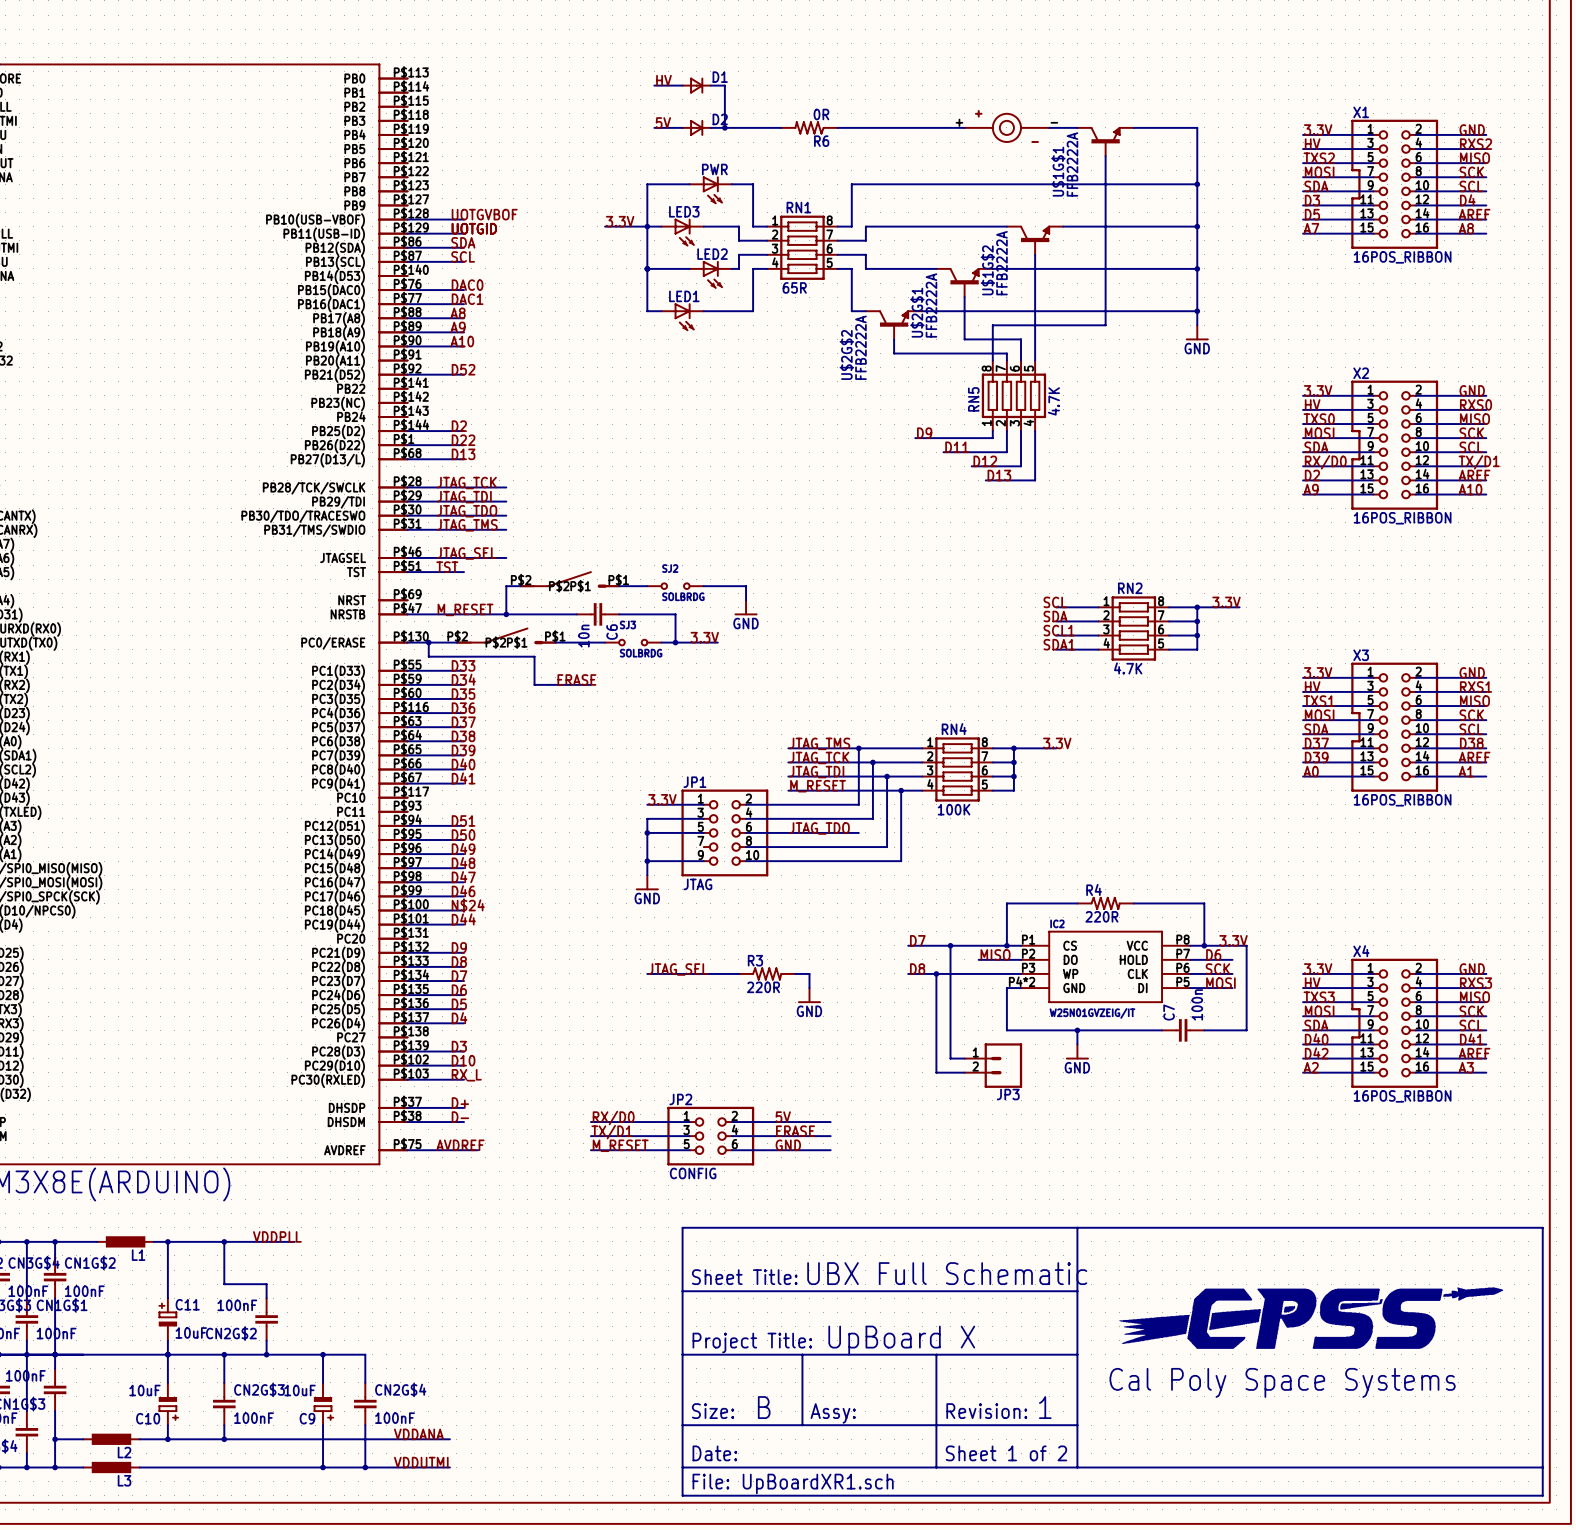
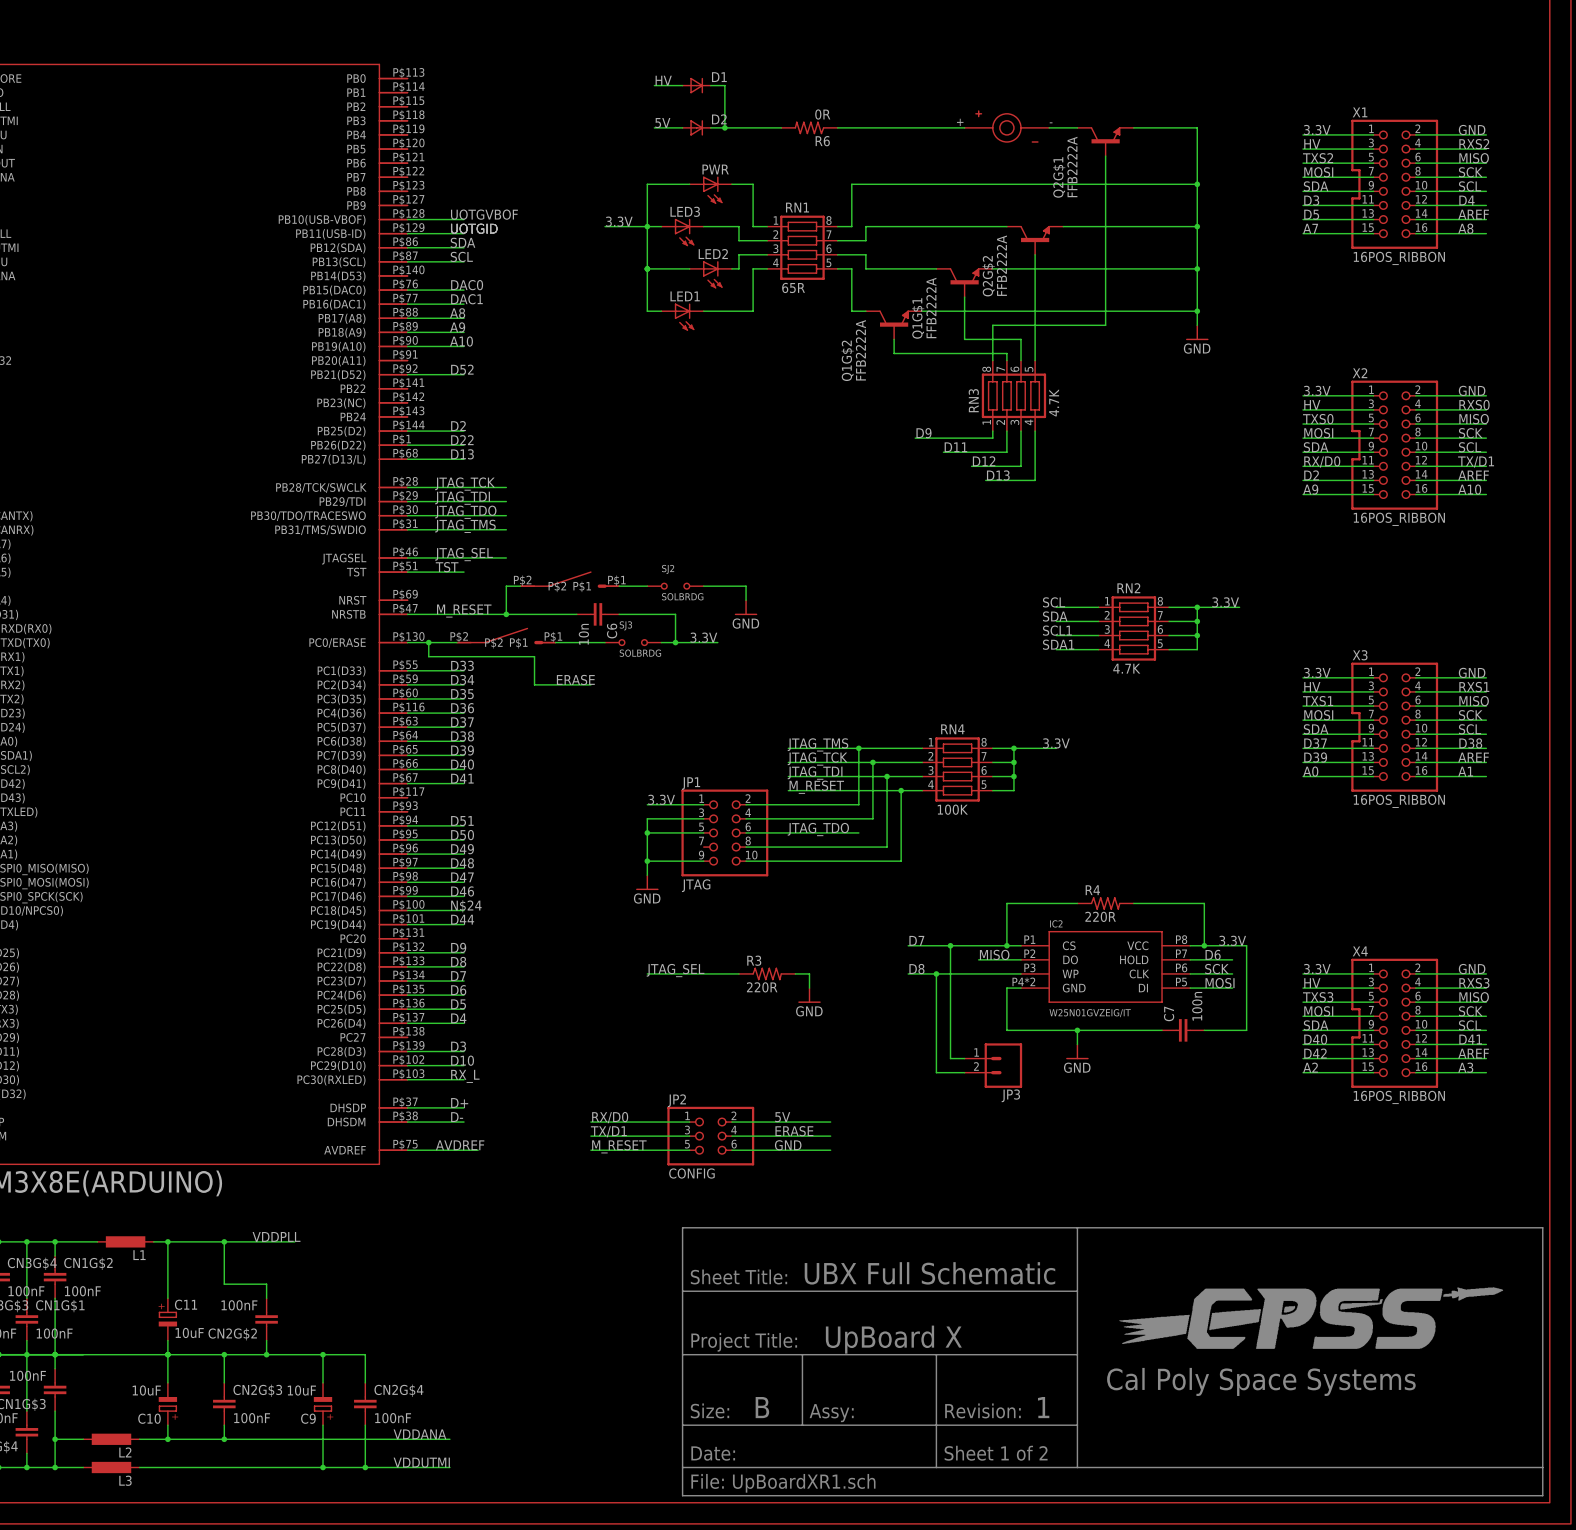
U$1G$1 name: U$1G$1 (1058, 171) -> Q2G$1 (1059, 177)
U$1G$2 name: U$1G$2 (987, 270) -> Q2G$2 (988, 276)
U$2G$1 name: U$2G$1 (917, 312) -> Q1G$1 (918, 318)
U$2G$2 name: U$2G$2 (846, 354) -> Q1G$2 (847, 360)
RN5 name: RN5 (973, 399) -> RN3 (973, 400)

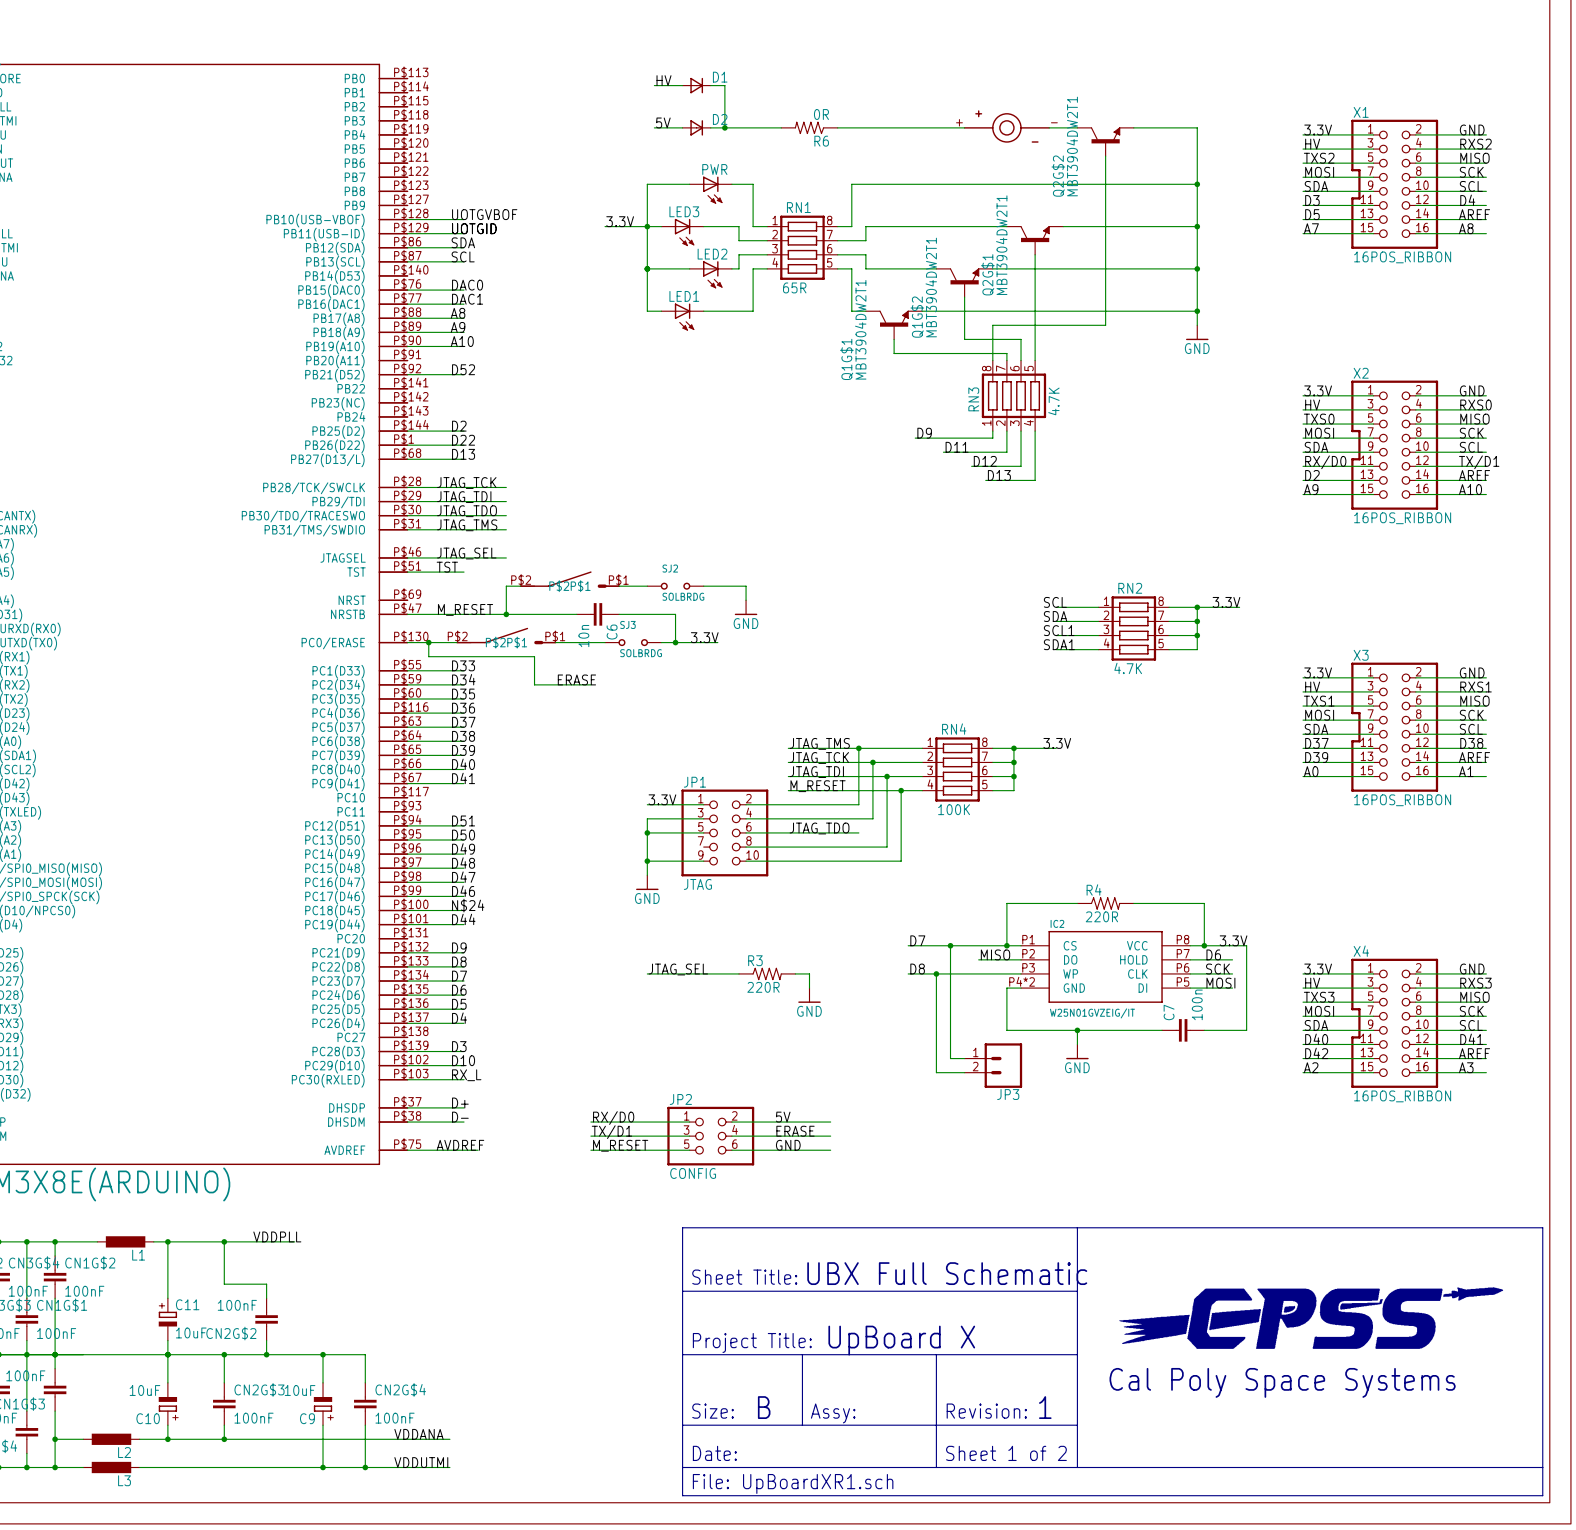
Q2G$1 value: FFB2222A (1072, 166) -> MBT3904DW2T1 (1072, 146)
Q2G$1 name: Q2G$1 (1059, 177) -> Q2G$2 (1058, 176)
Q2G$2 value: FFB2222A (1001, 265) -> MBT3904DW2T1 (1001, 245)
Q2G$2 name: Q2G$2 (988, 276) -> Q2G$1 (987, 274)
Q1G$1 value: FFB2222A (931, 308) -> MBT3904DW2T1 (931, 287)
Q1G$1 name: Q1G$1 (918, 318) -> Q1G$2 (917, 317)
Q1G$2 value: FFB2222A (860, 350) -> MBT3904DW2T1 (860, 329)
Q1G$2 name: Q1G$2 (847, 360) -> Q1G$1 (846, 359)

